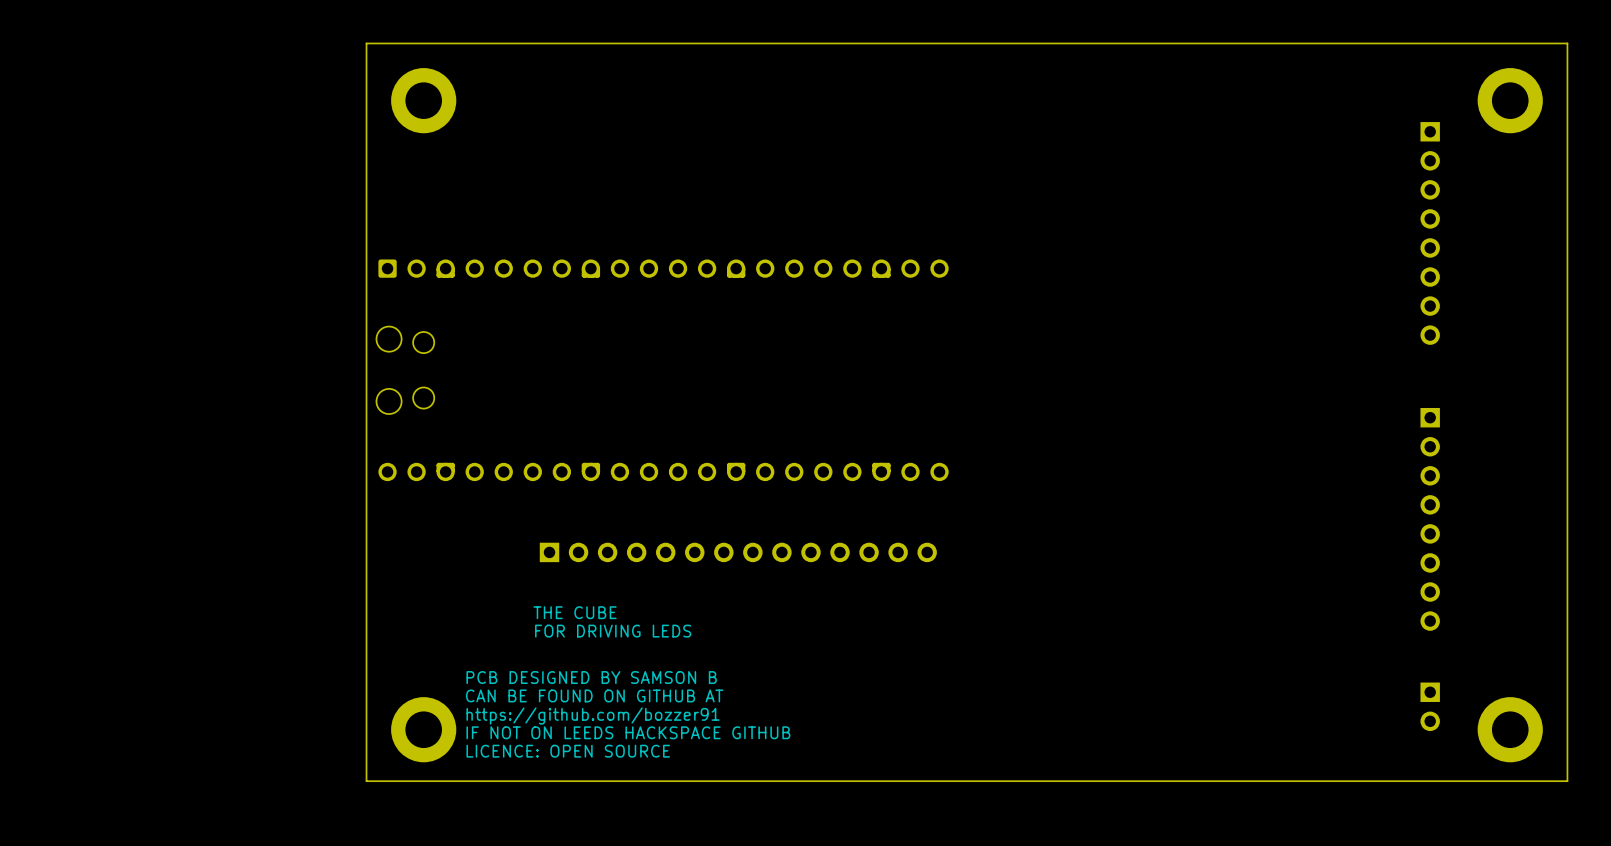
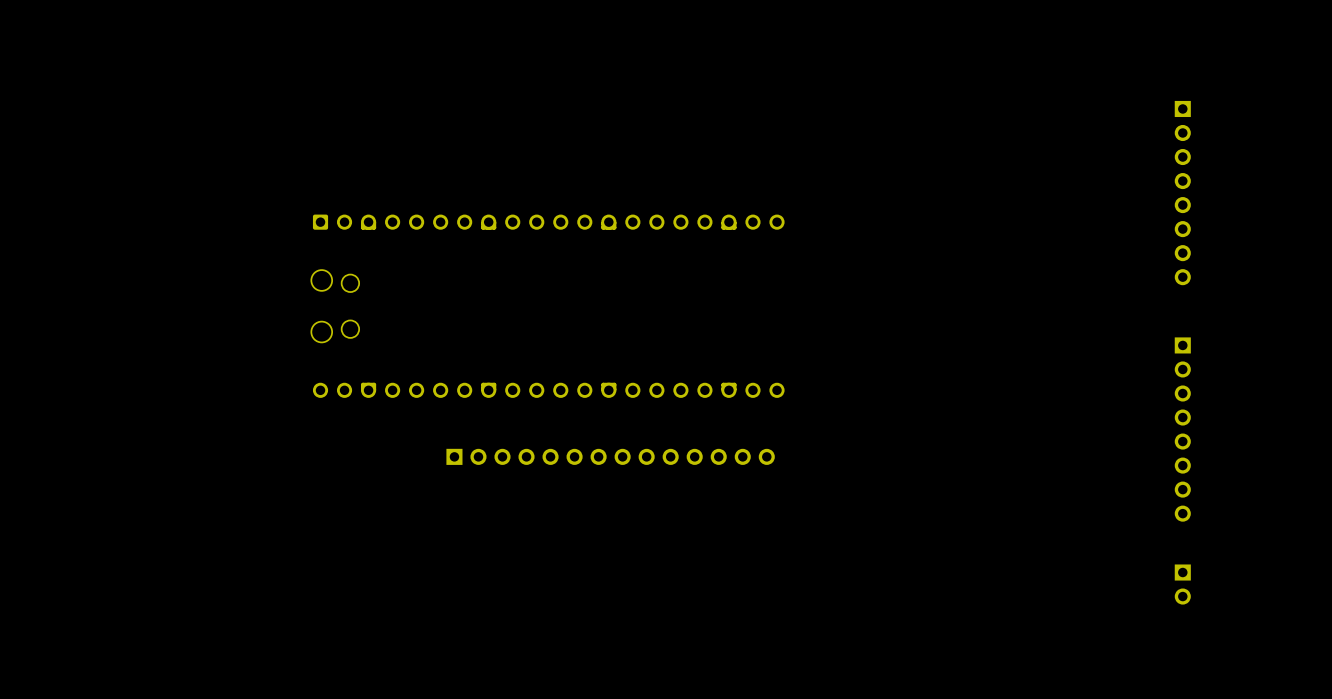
board edge: (1567, 43) (366, 43) (366, 781) (1567, 781) (1567, 43) -> none
part: (423, 100) -> none
part: (1510, 100) -> none
text: THE CUBE (575, 612) -> none
text: FOR DRIVING LEDS (613, 631) -> none
text: PCB DESIGNED BY SAMSON B (591, 677) -> none
text: CAN BE FOUND ON GITHUB AT (594, 695) -> none
text: https://github.com/bozzer91 (593, 716) -> none
part: (423, 729) -> none
part: (1510, 729) -> none
text: IF NOT ON LEEDS HACKSPACE GITHUB (628, 732) -> none
text: LICENCE: OPEN SOURCE (568, 751) -> none

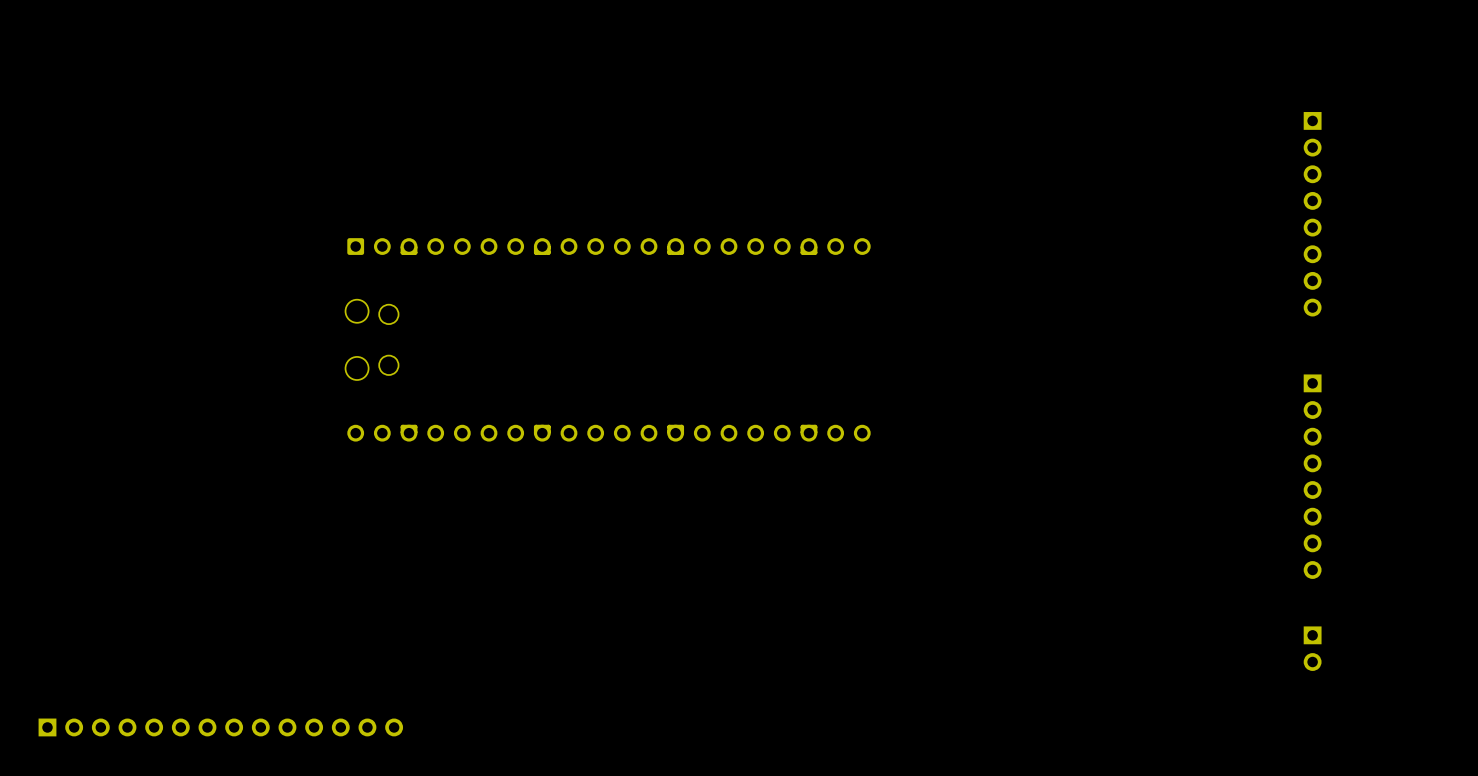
part: (610, 456) -> none
part: none -> (220, 727)

